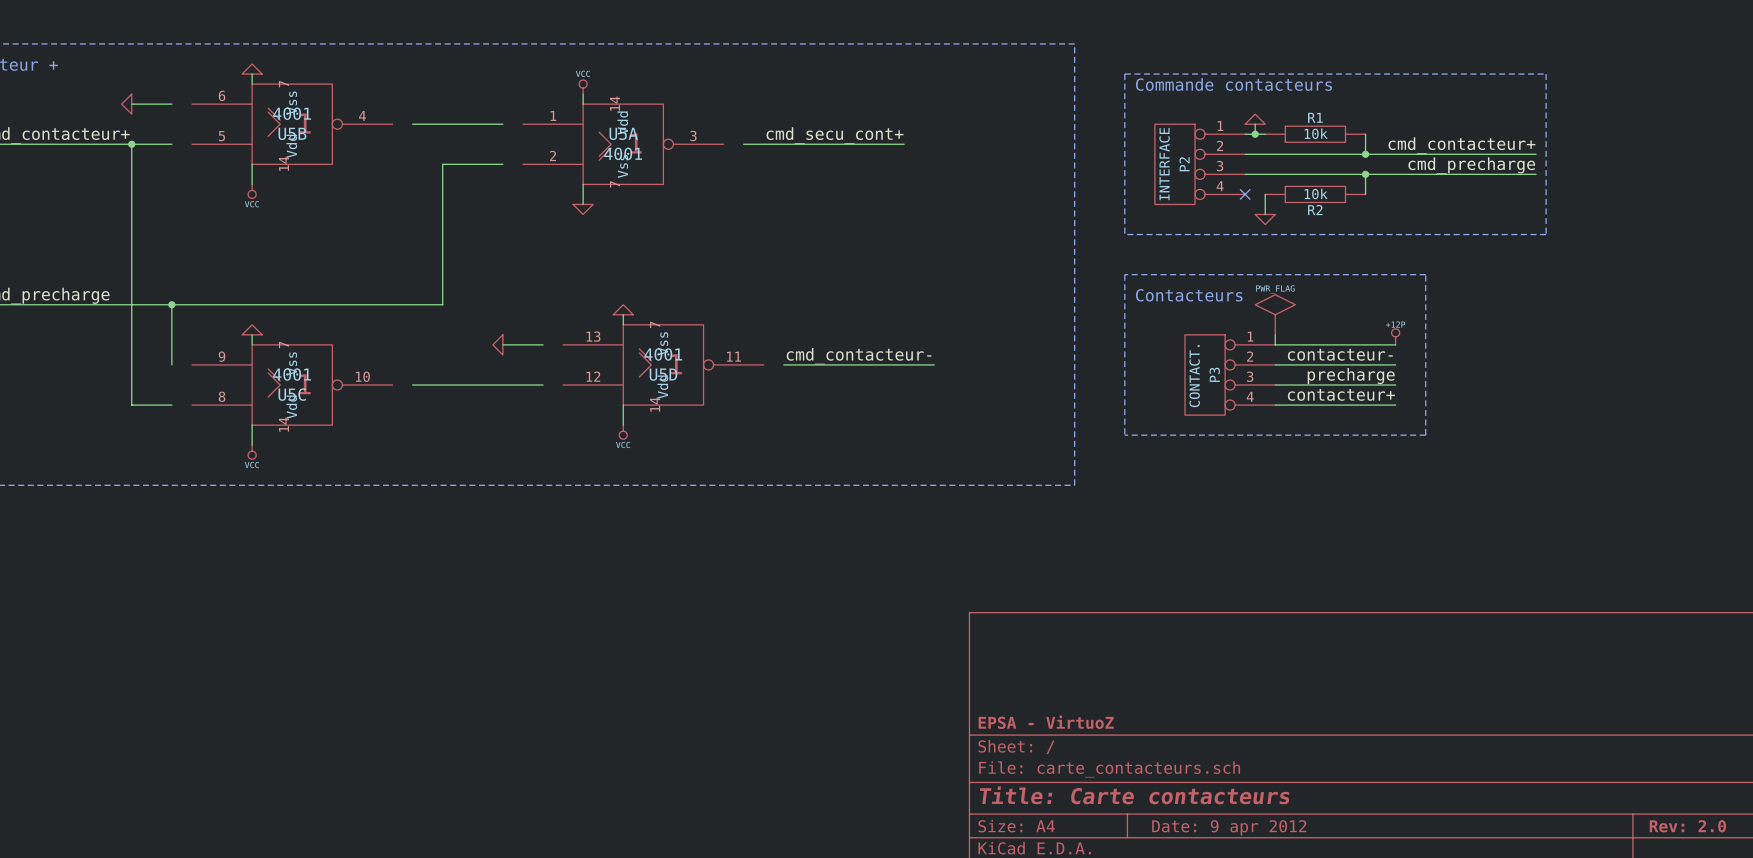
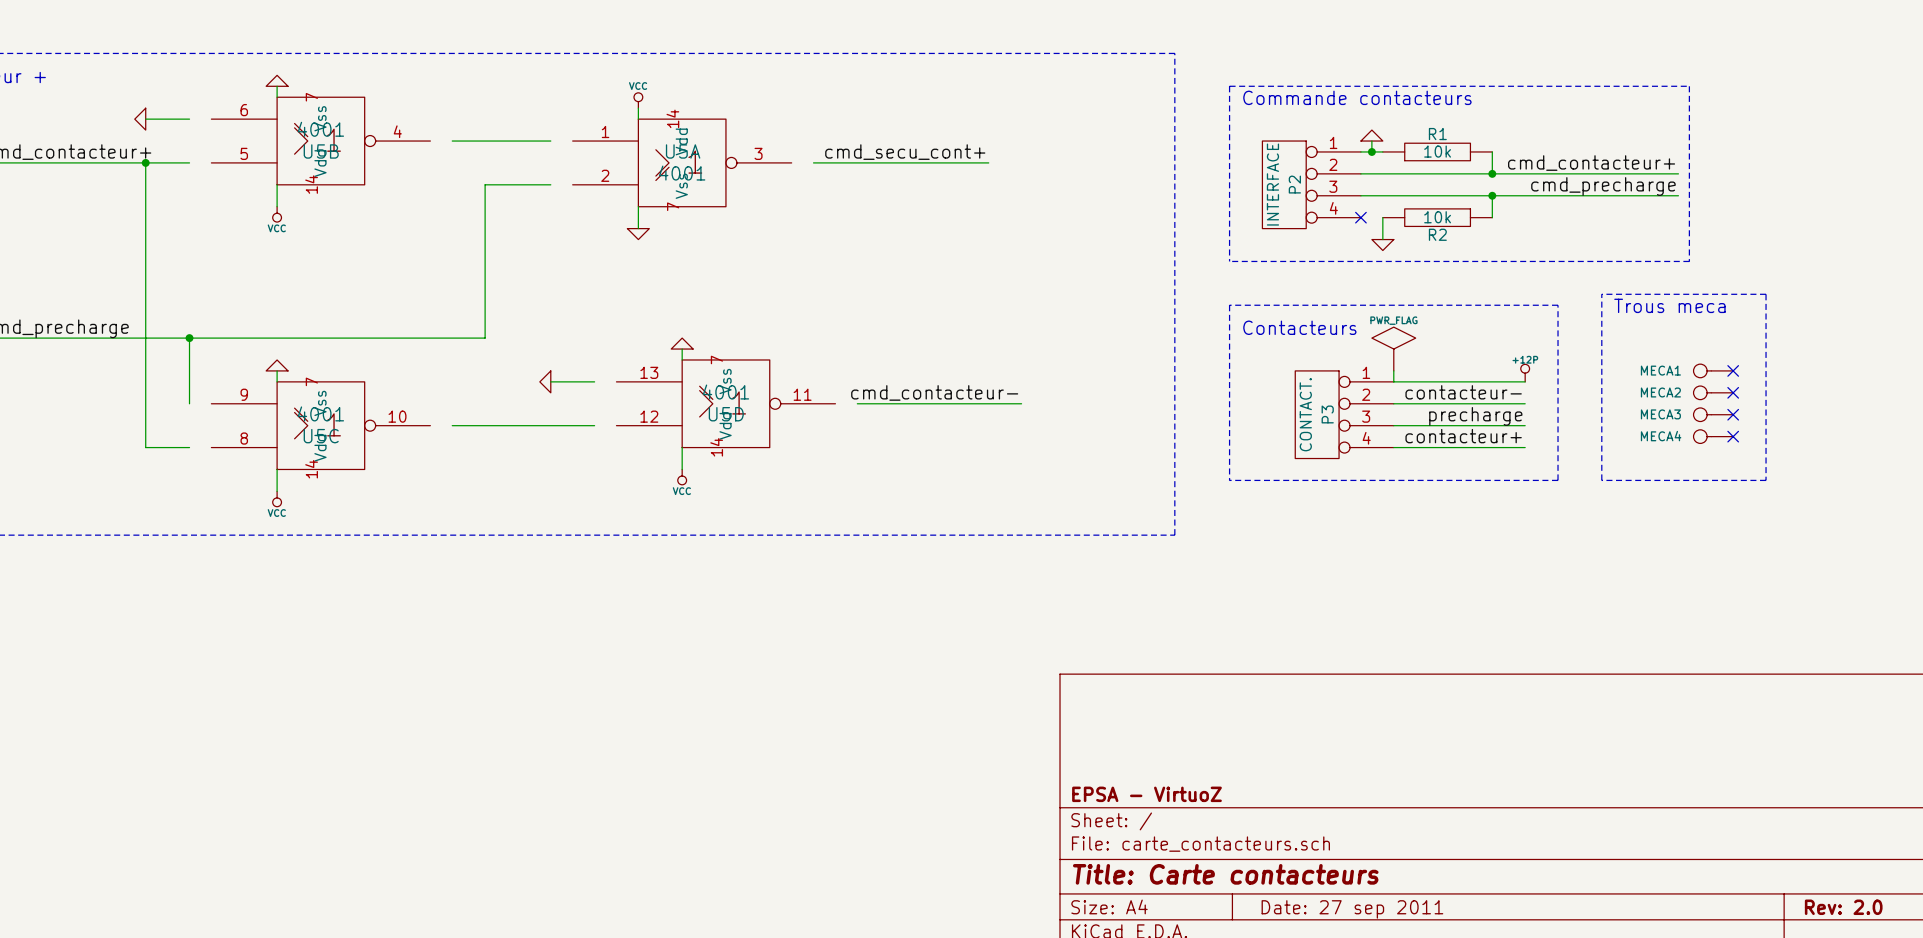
line: none -> (1601, 294) (1766, 294) (1766, 480) (1601, 480) (1601, 294)
text: none -> Trous meca (1669, 305)
MECA1: none -> (1713, 370)
no-connect mark: none -> (1733, 370)
MECA2: none -> (1713, 392)
no-connect mark: none -> (1733, 392)
MECA3: none -> (1713, 414)
no-connect mark: none -> (1733, 414)
MECA4: none -> (1713, 436)
no-connect mark: none -> (1733, 436)
title block: Date: 9 apr 2012 (1229, 827) -> Date: 27 sep 2011 (1352, 909)

